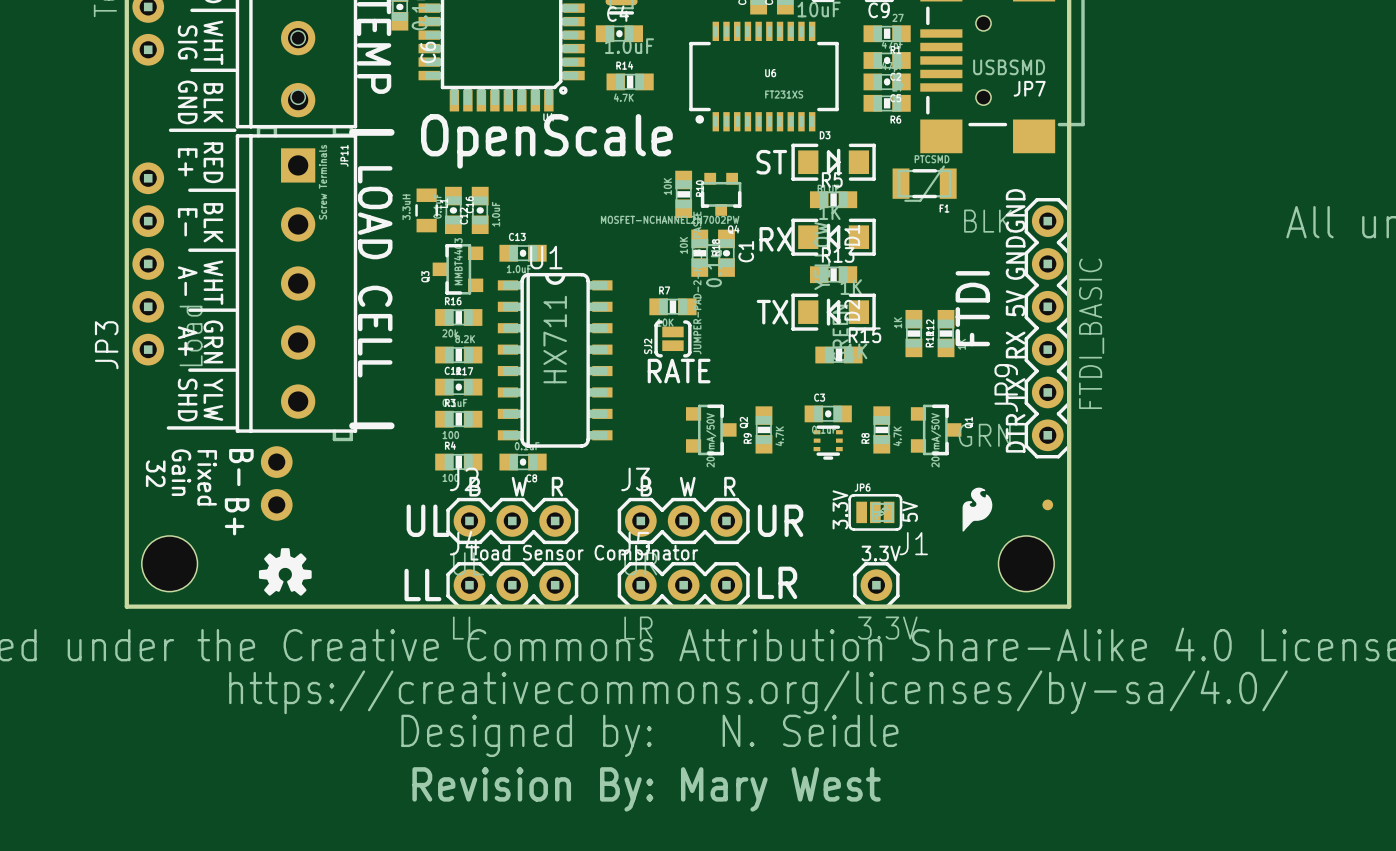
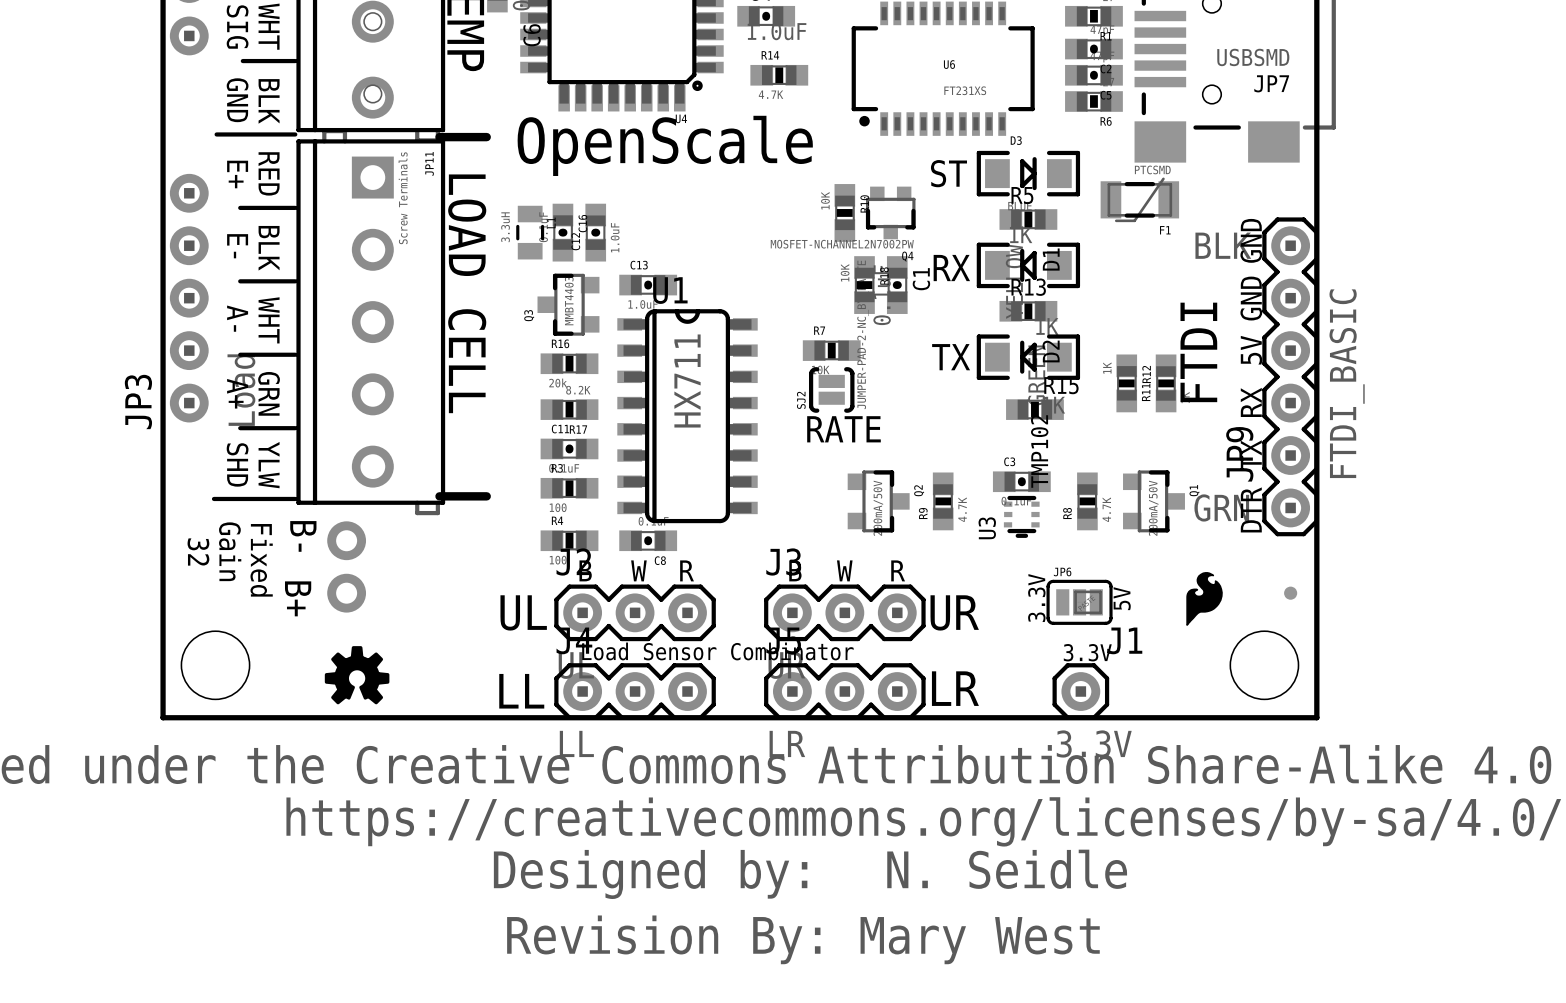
U3 value: none -> TMP102 (1039, 451)
U3 name: none -> U3 (987, 528)

